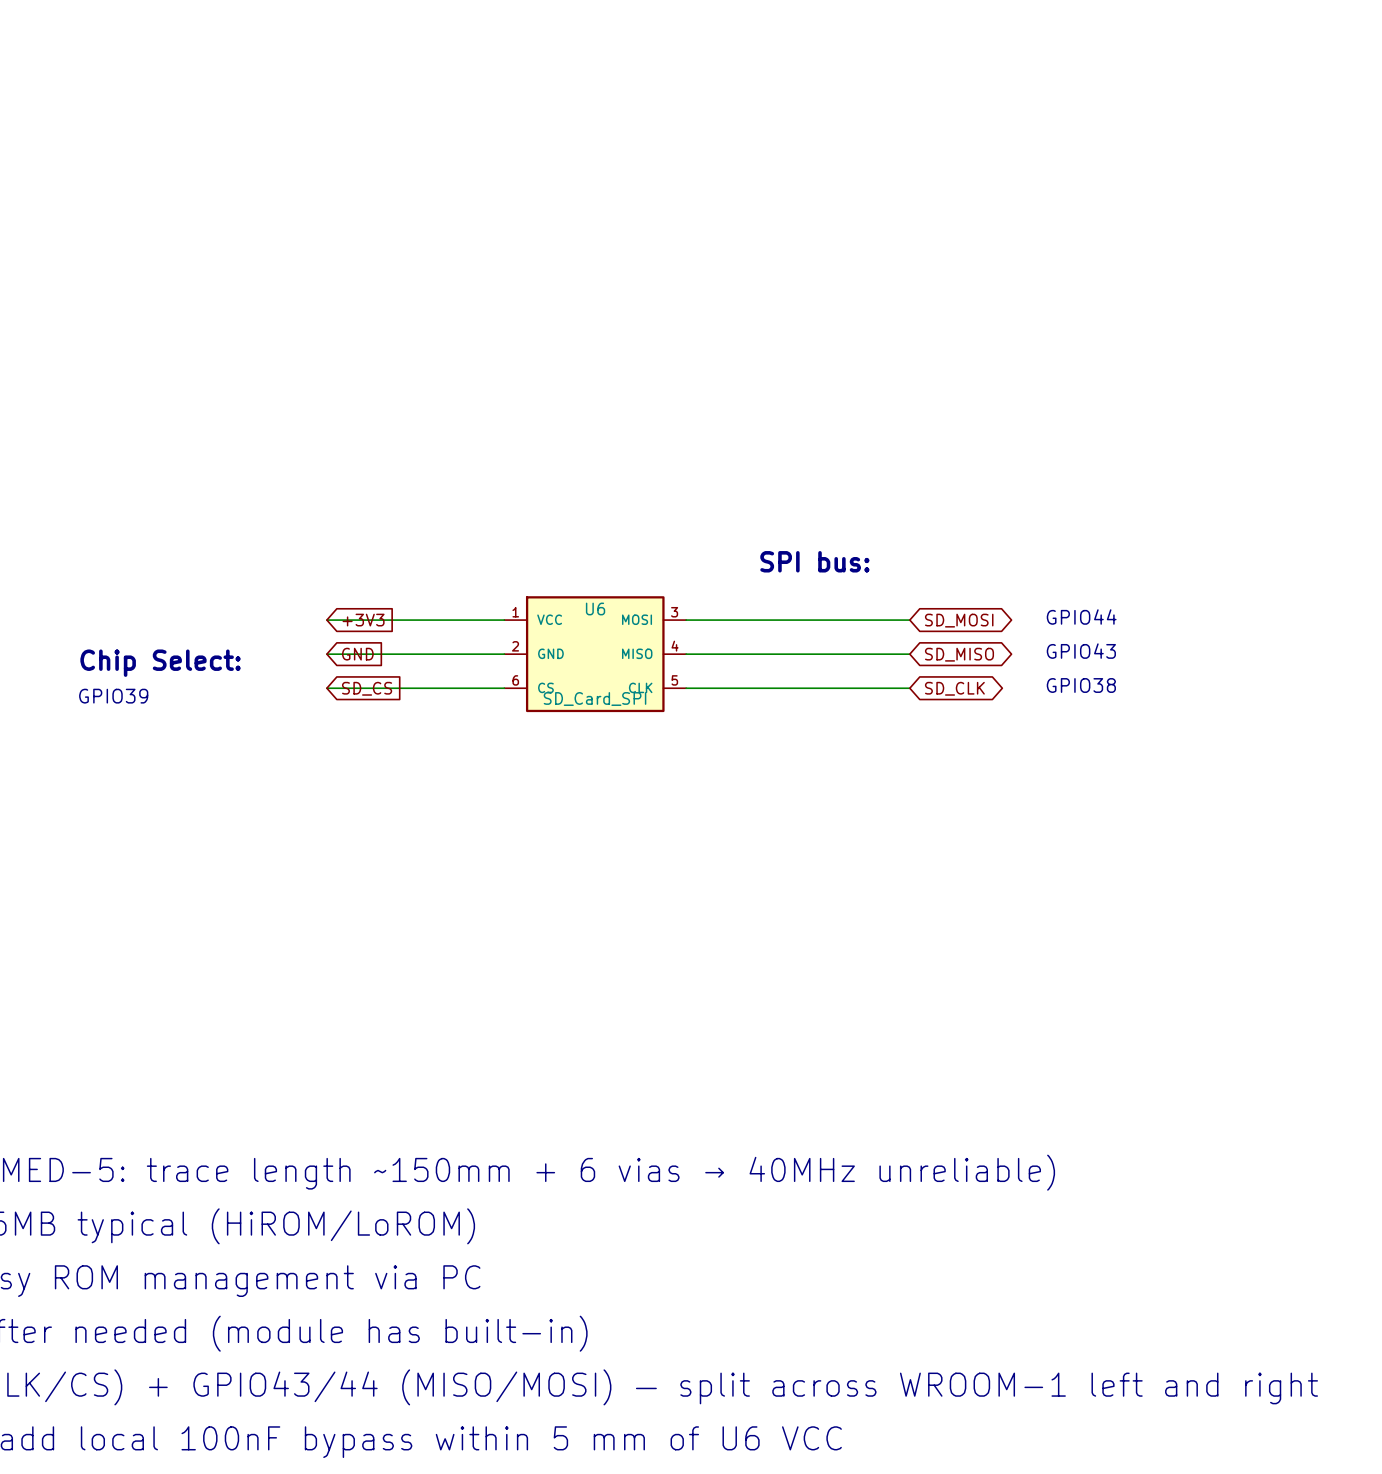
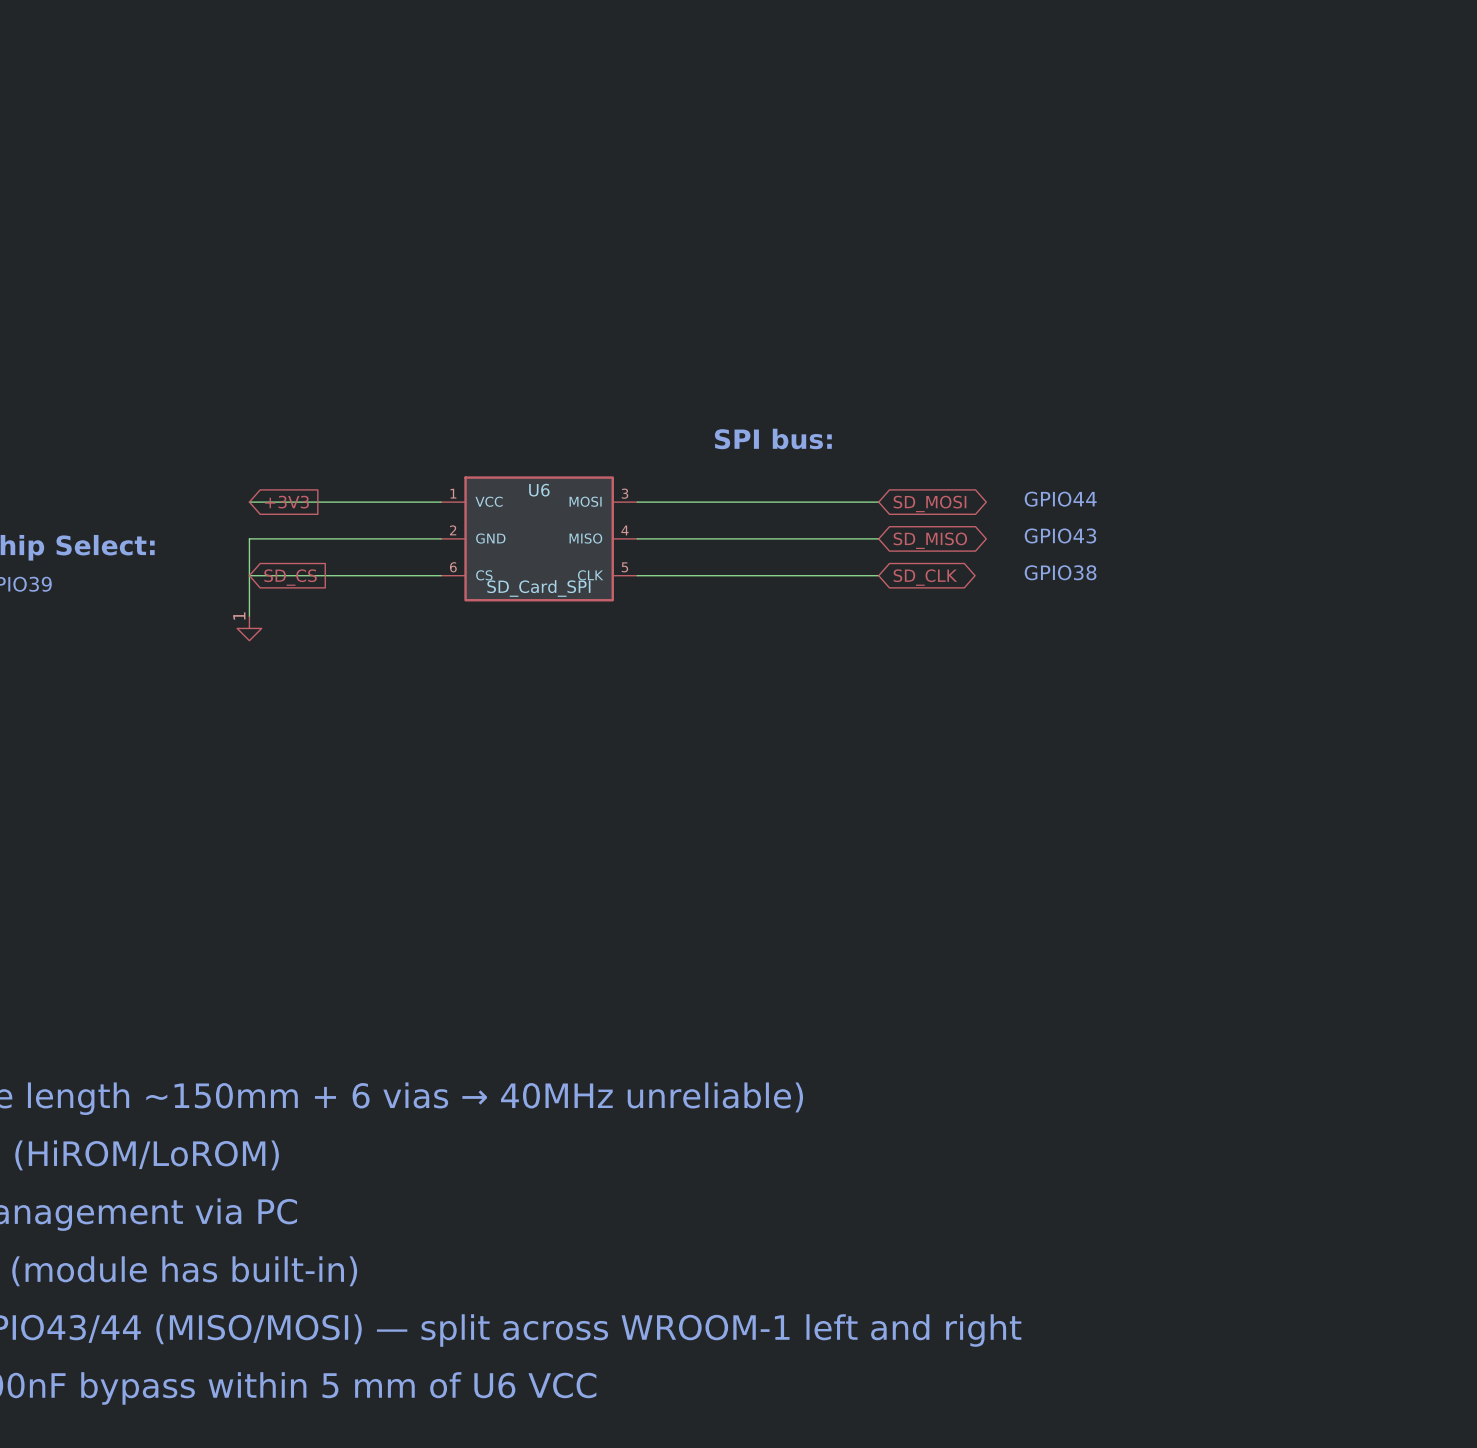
wire: none -> (249, 538) (249, 616)
global label: GND (357, 654) -> none
power symbol: none -> (249, 628)

